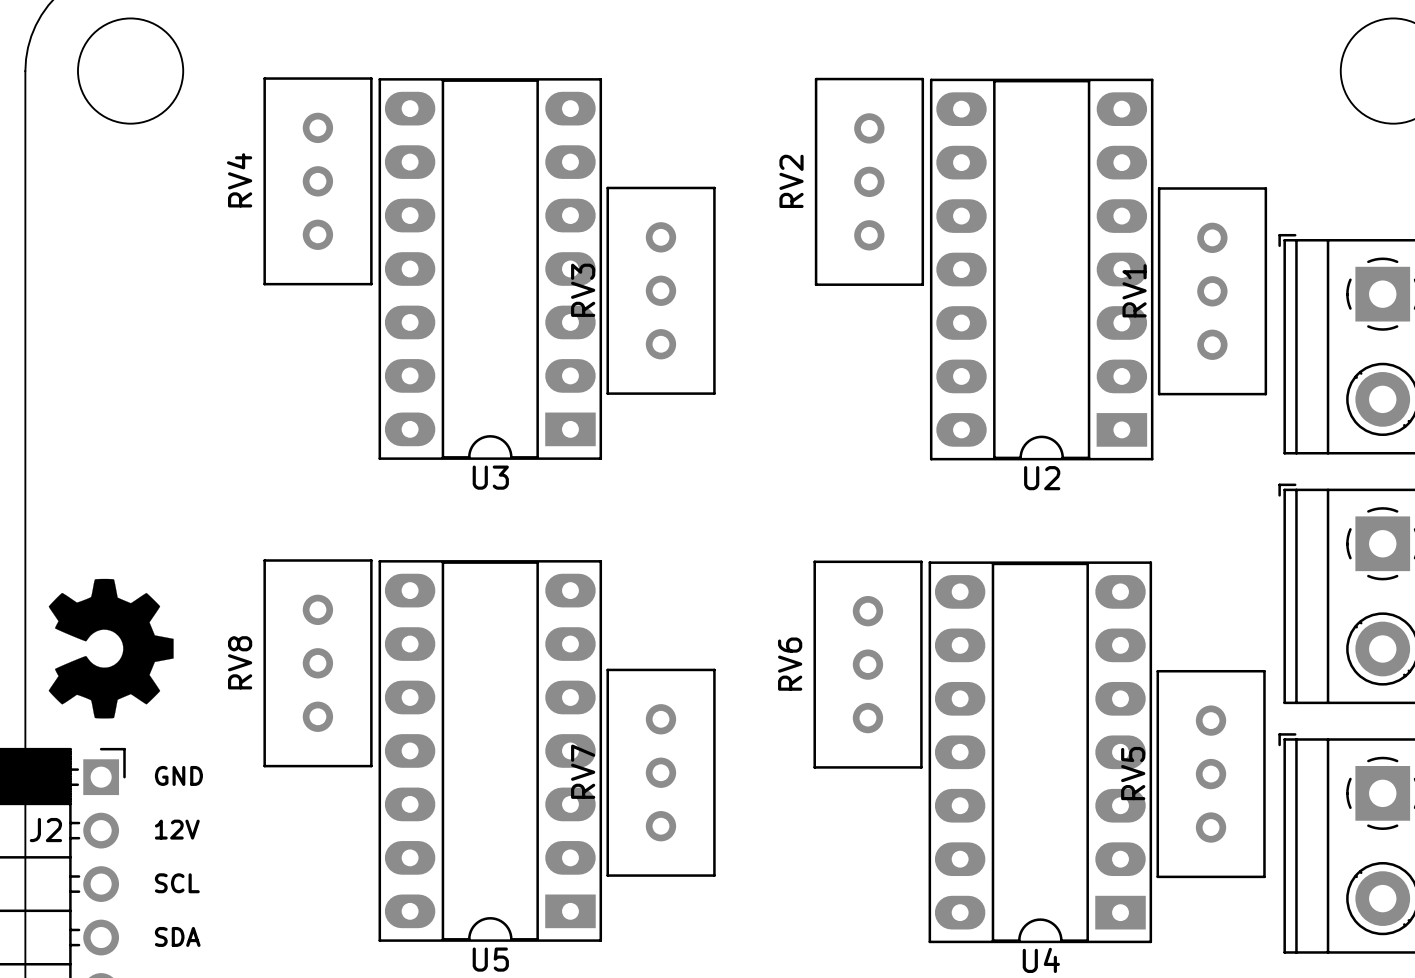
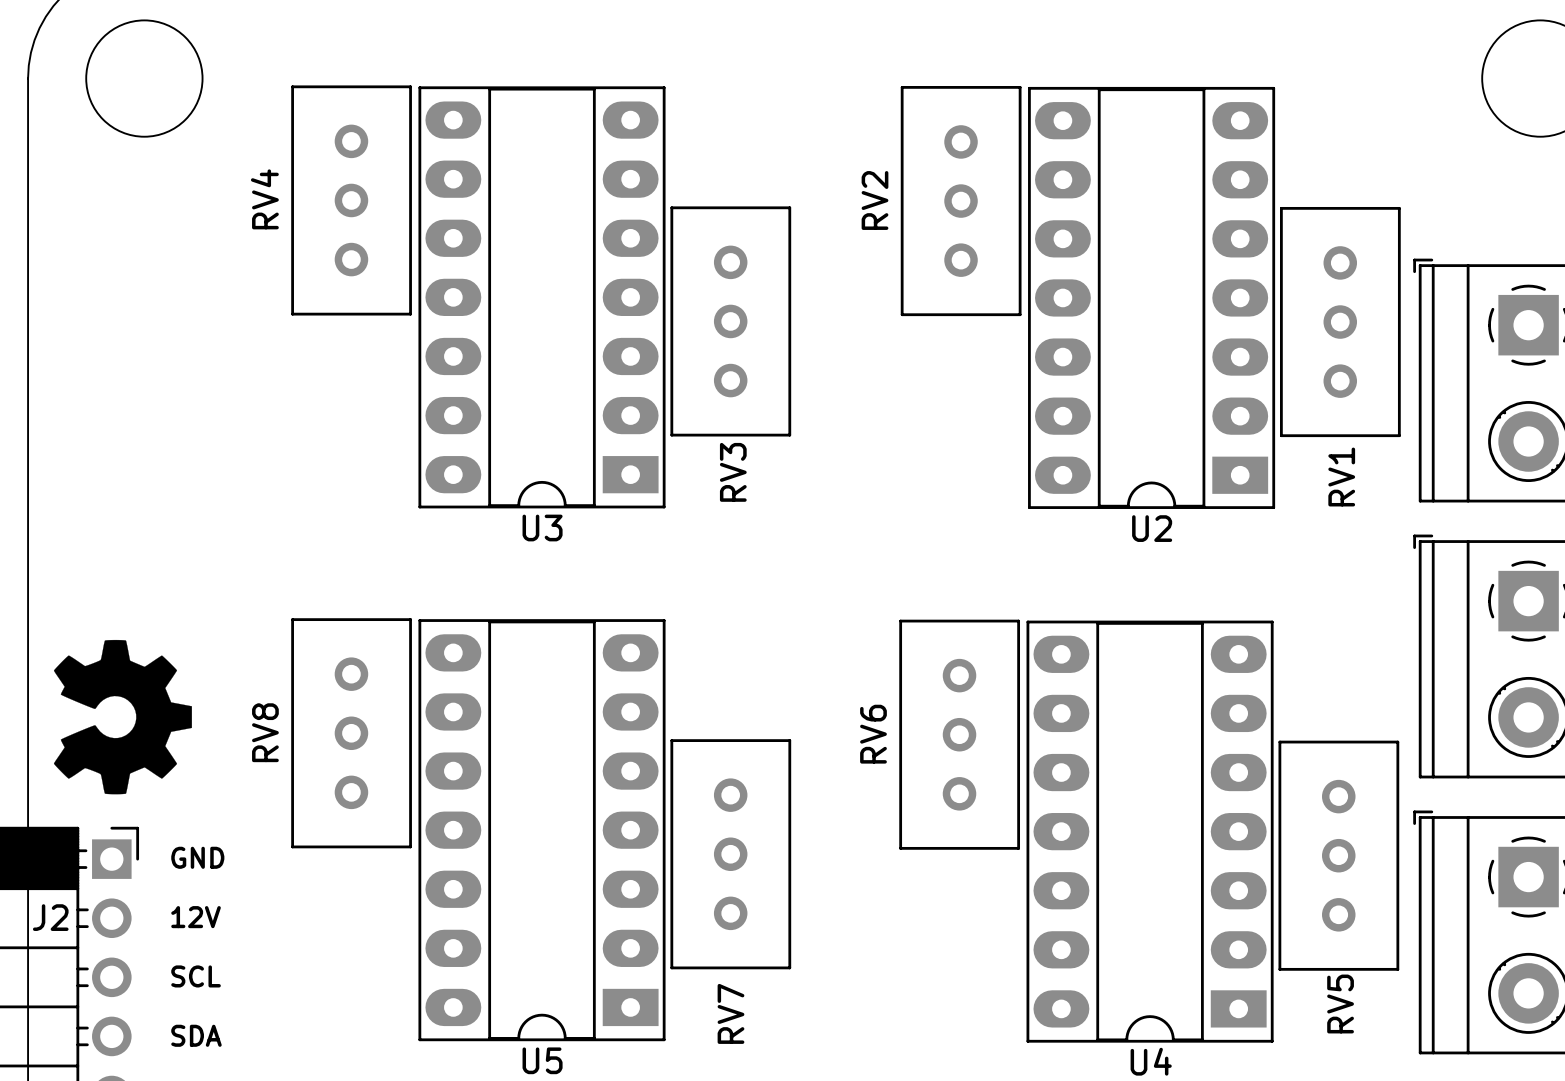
RV3 name position: RV3 (583, 290) -> RV3 (733, 472)
RV1 name position: RV1 (1134, 290) -> RV1 (1341, 477)
RV7 name position: RV7 (583, 771) -> RV7 (730, 1013)
RV5 name position: RV5 (1133, 773) -> RV5 (1340, 1004)

